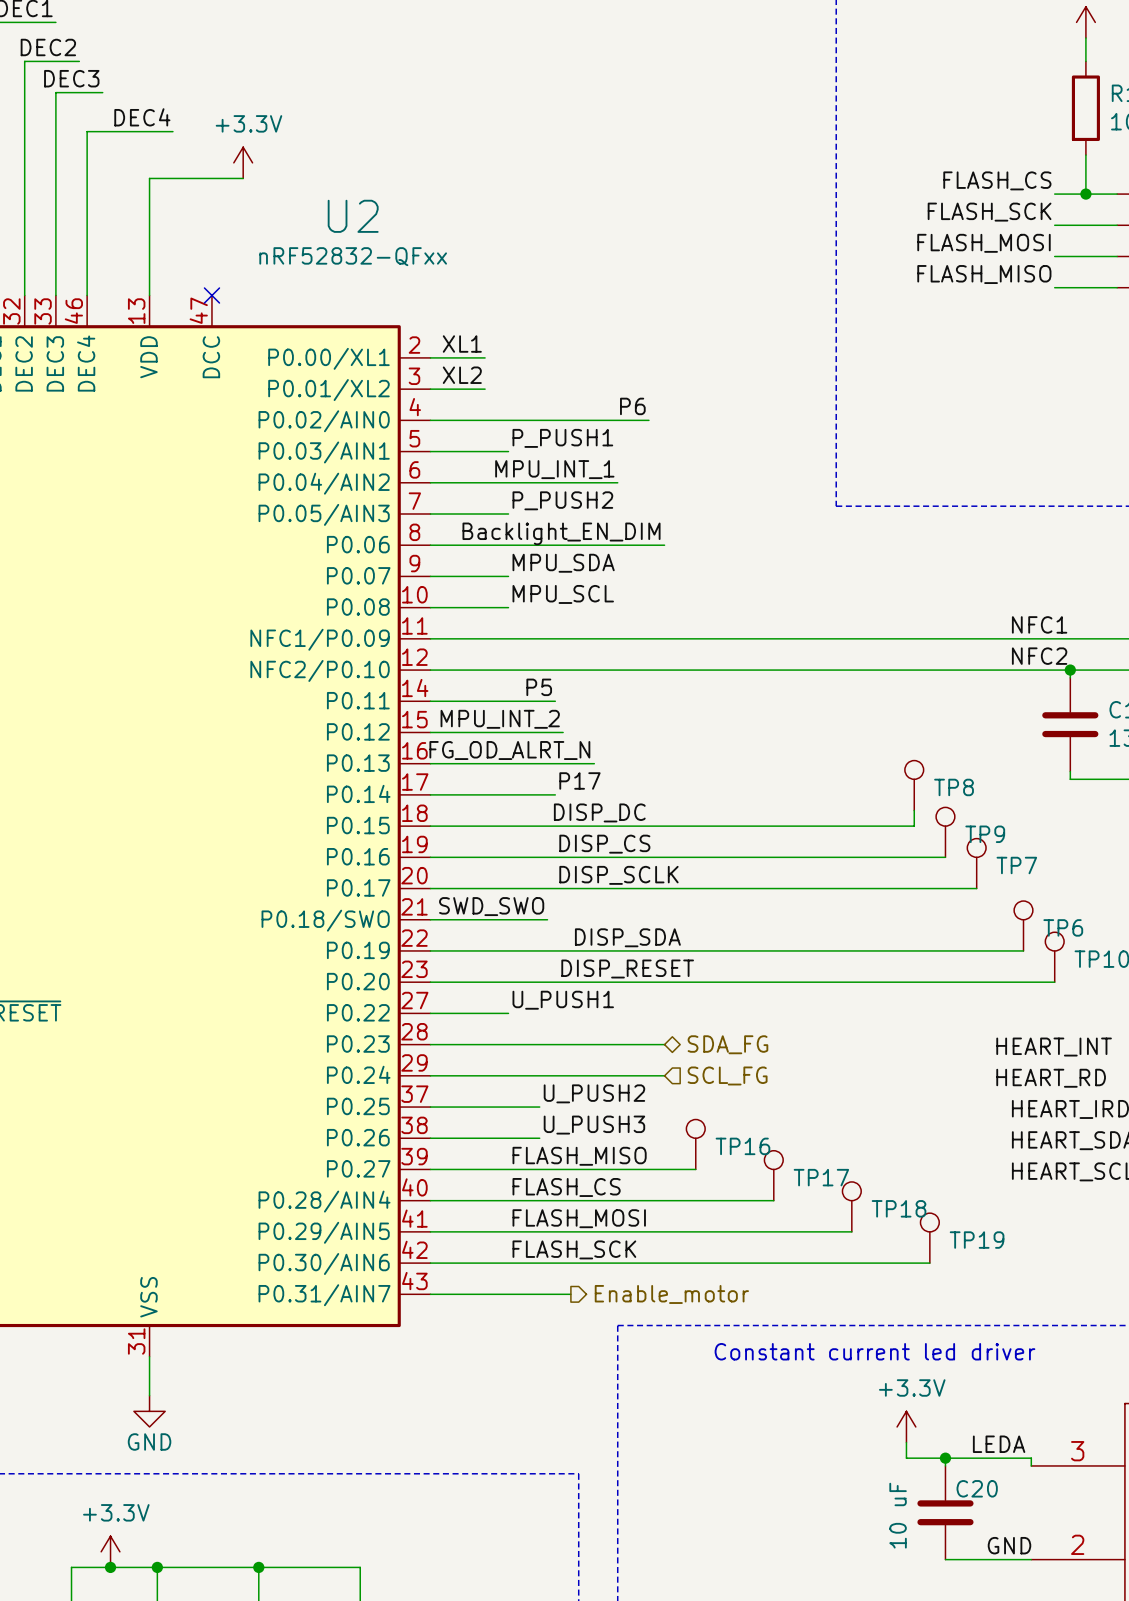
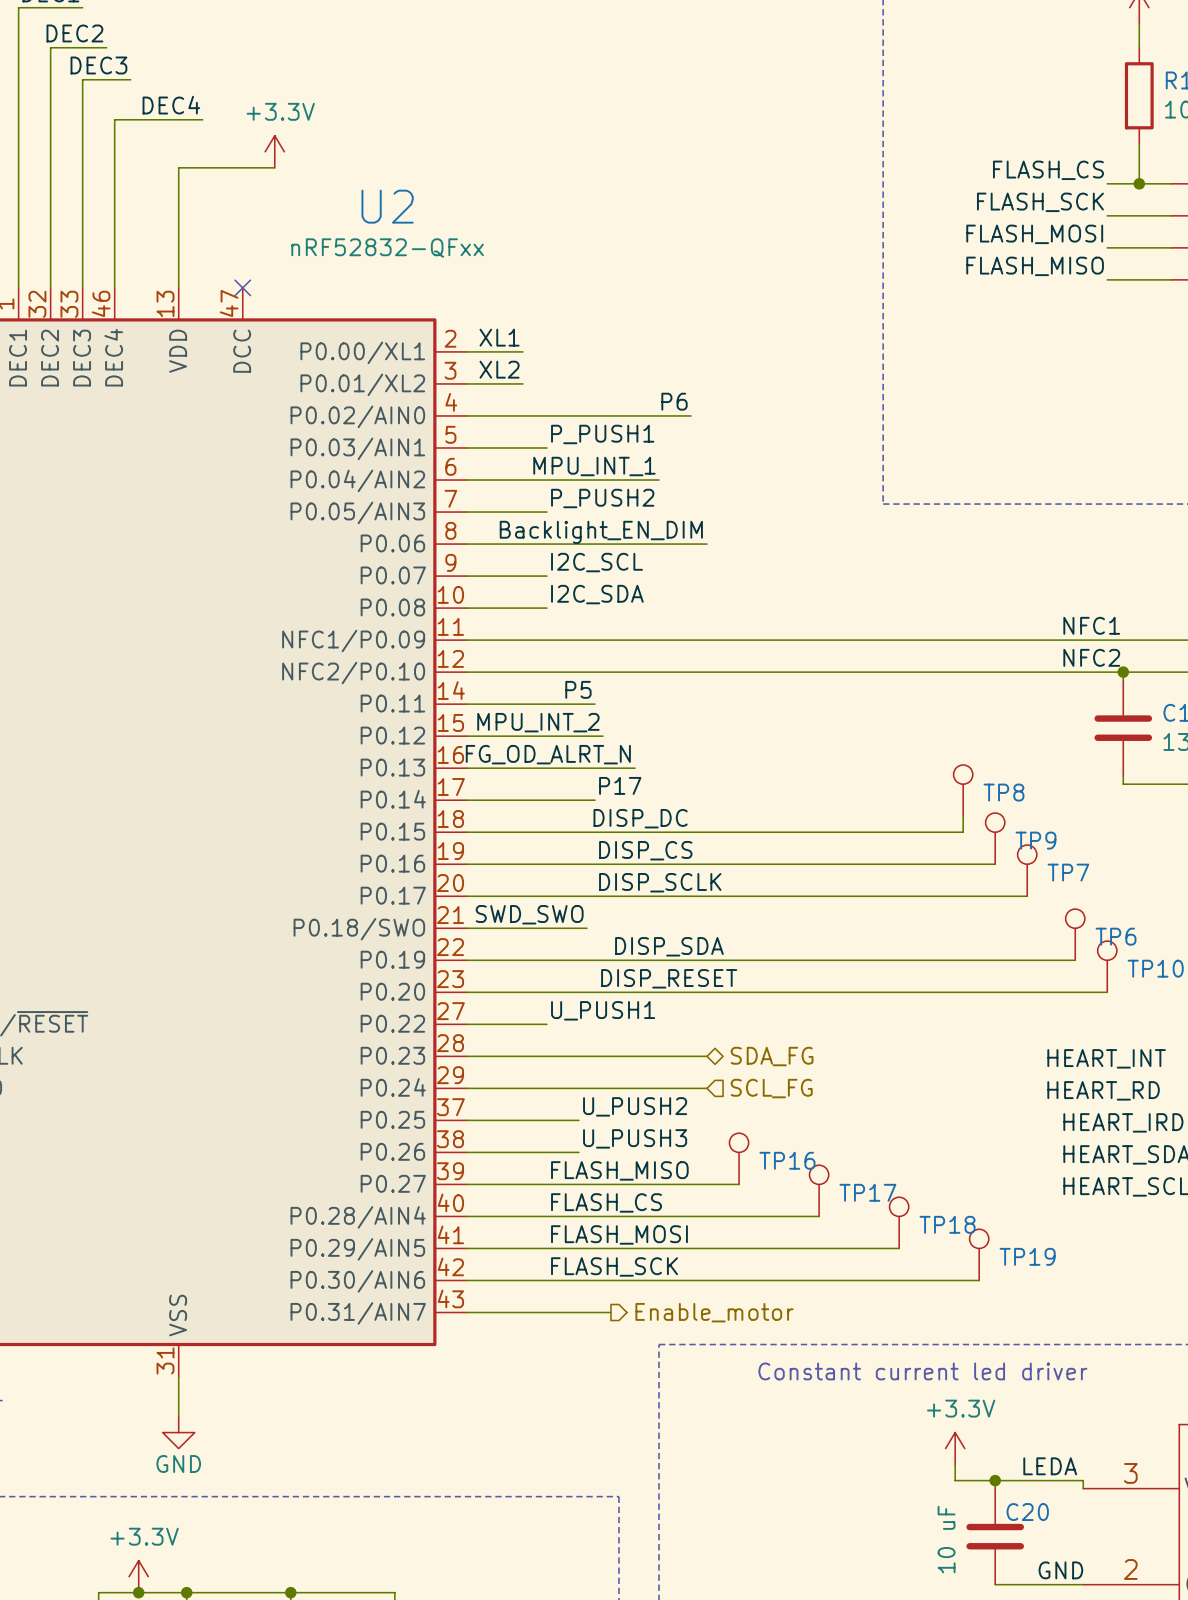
label: MPU_SDA (563, 563) -> I2C_SCL (596, 562)
label: MPU_SCL (563, 594) -> I2C_SDA (597, 594)

